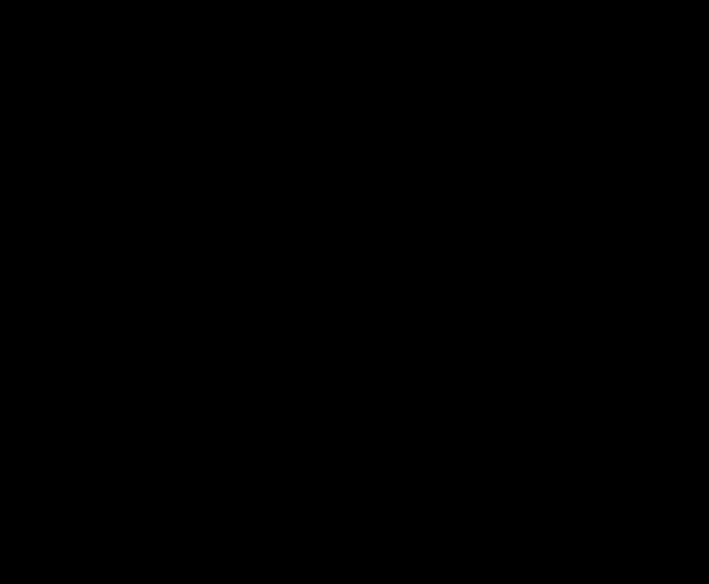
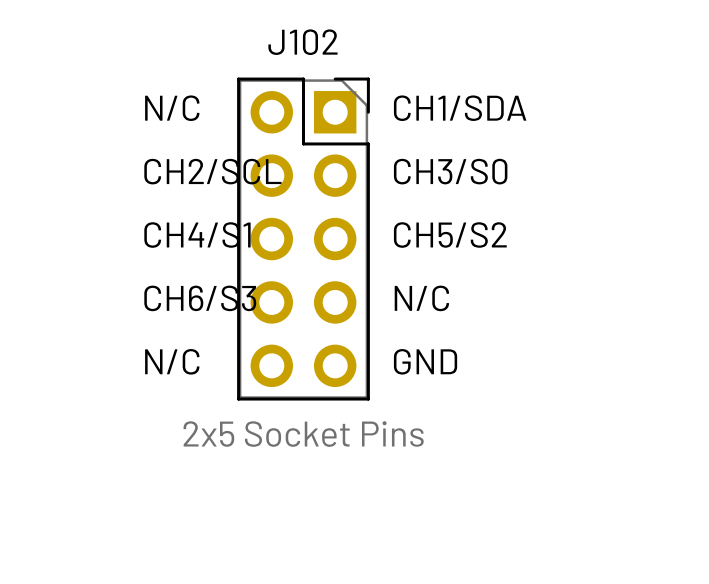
text: none -> N/C (172, 108)
text: none -> CH1/SDA (460, 108)
text: none -> CH2/SCL (212, 171)
text: none -> CH3/S0 (450, 171)
text: none -> CH4/S1 (197, 235)
text: none -> CH5/S2 (450, 235)
J102: none -> 2x5 Socket Pins (303, 239)
text: none -> CH6/S3 (200, 298)
text: none -> N/C (421, 298)
text: none -> GND (425, 361)
text: none -> N/C (172, 361)

